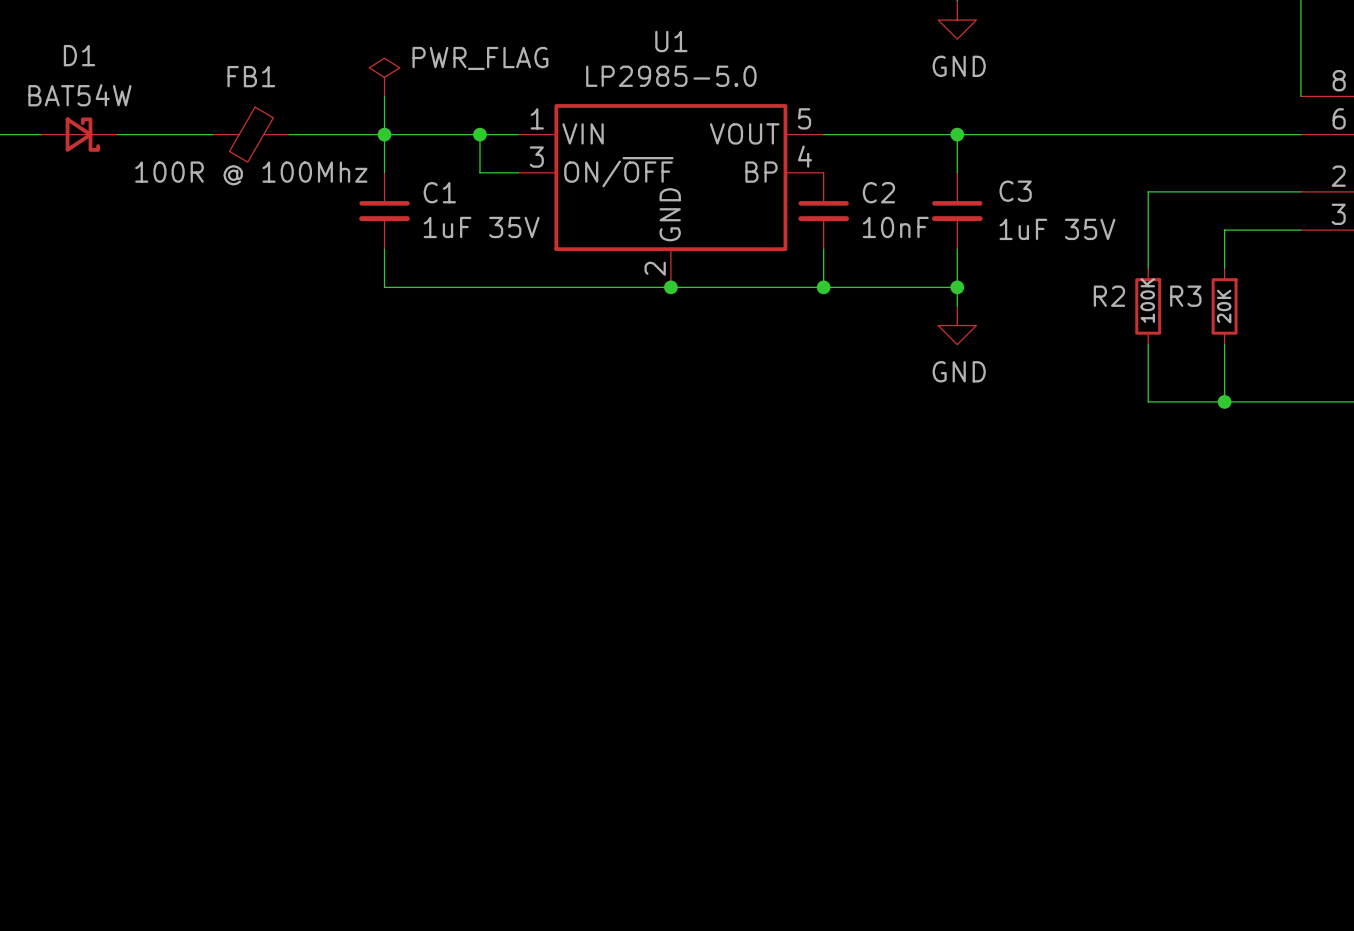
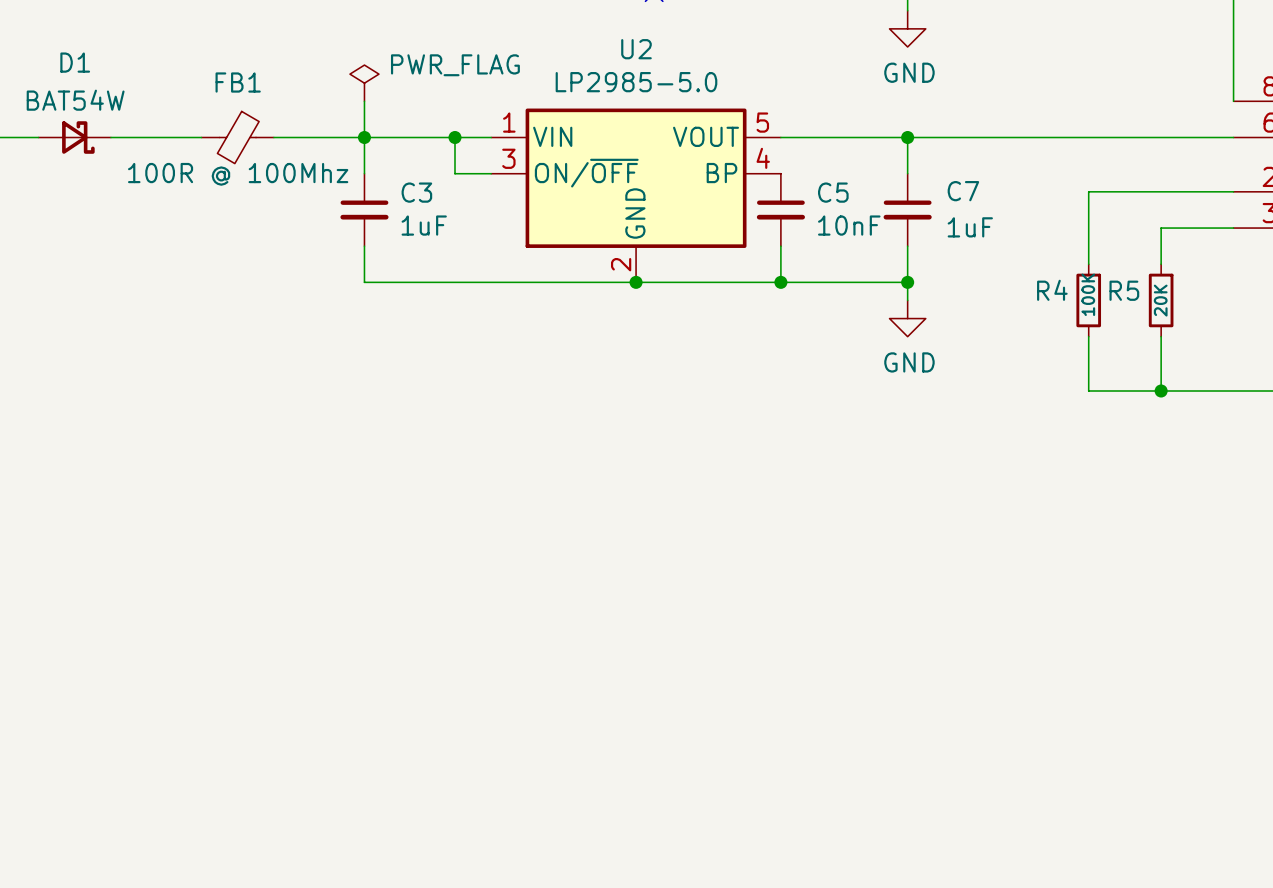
U1 name: U1 (671, 41) -> U2 (636, 49)
C3 name: C3 (1015, 191) -> C7 (963, 191)
C1 name: C1 (439, 192) -> C3 (416, 192)
C2 name: C2 (878, 192) -> C5 (833, 192)
C1 value: 1uF 35V (481, 227) -> 1uF (424, 225)
C3 value: 1uF 35V (1057, 229) -> 1uF (970, 227)
R2 name: R2 (1109, 296) -> R4 (1052, 290)
R3 name: R3 (1185, 296) -> R5 (1124, 290)

